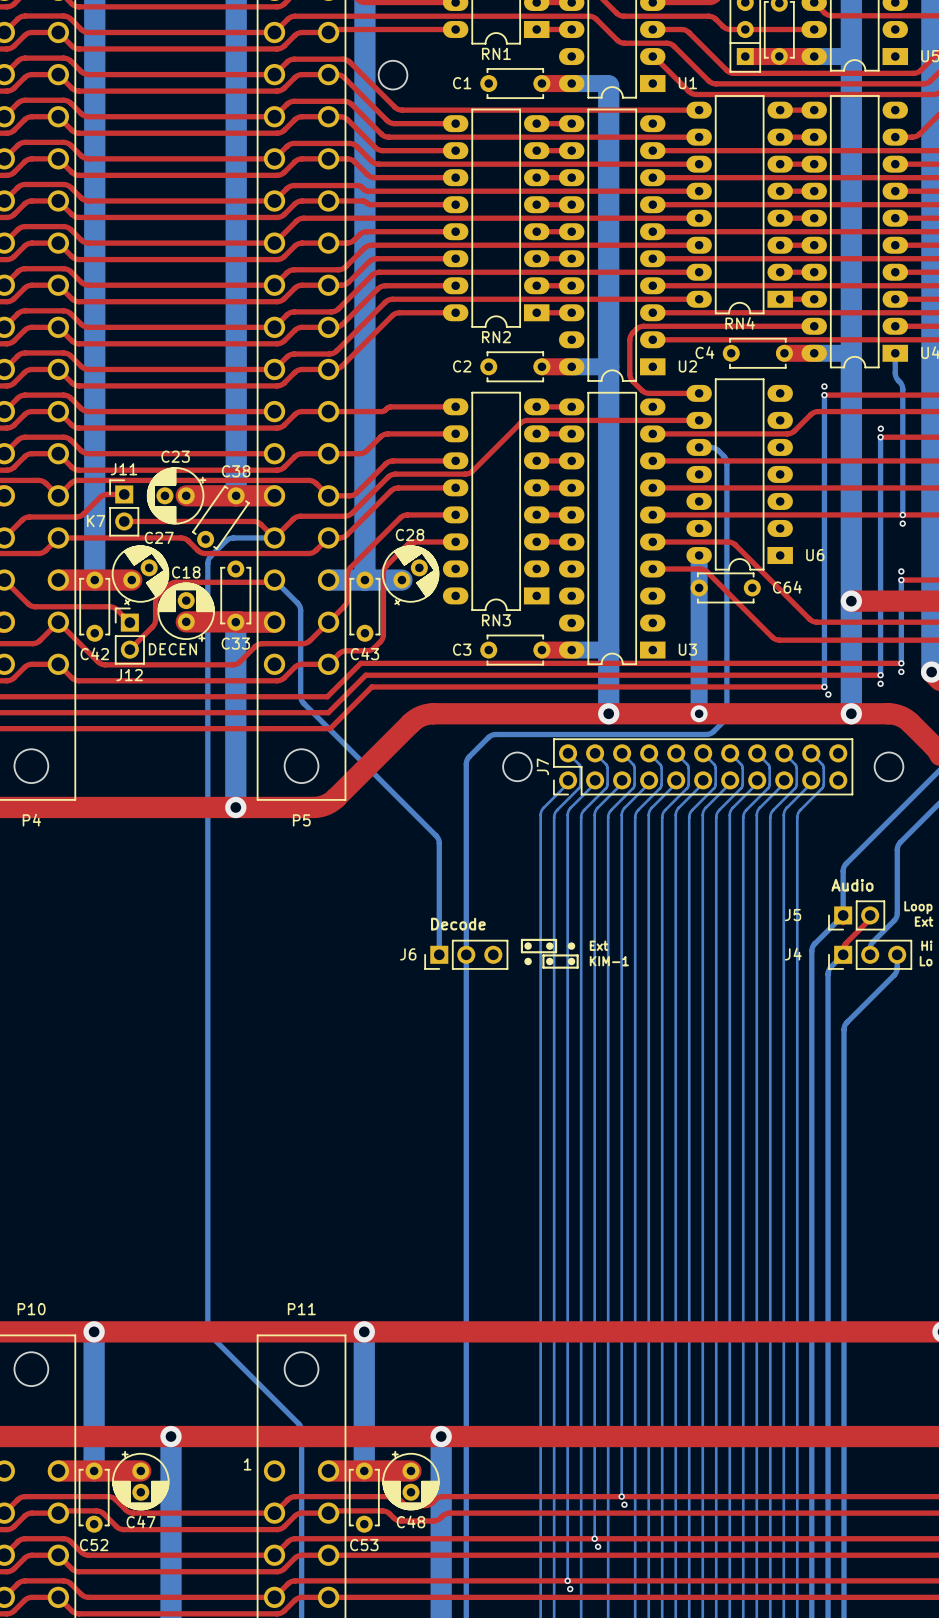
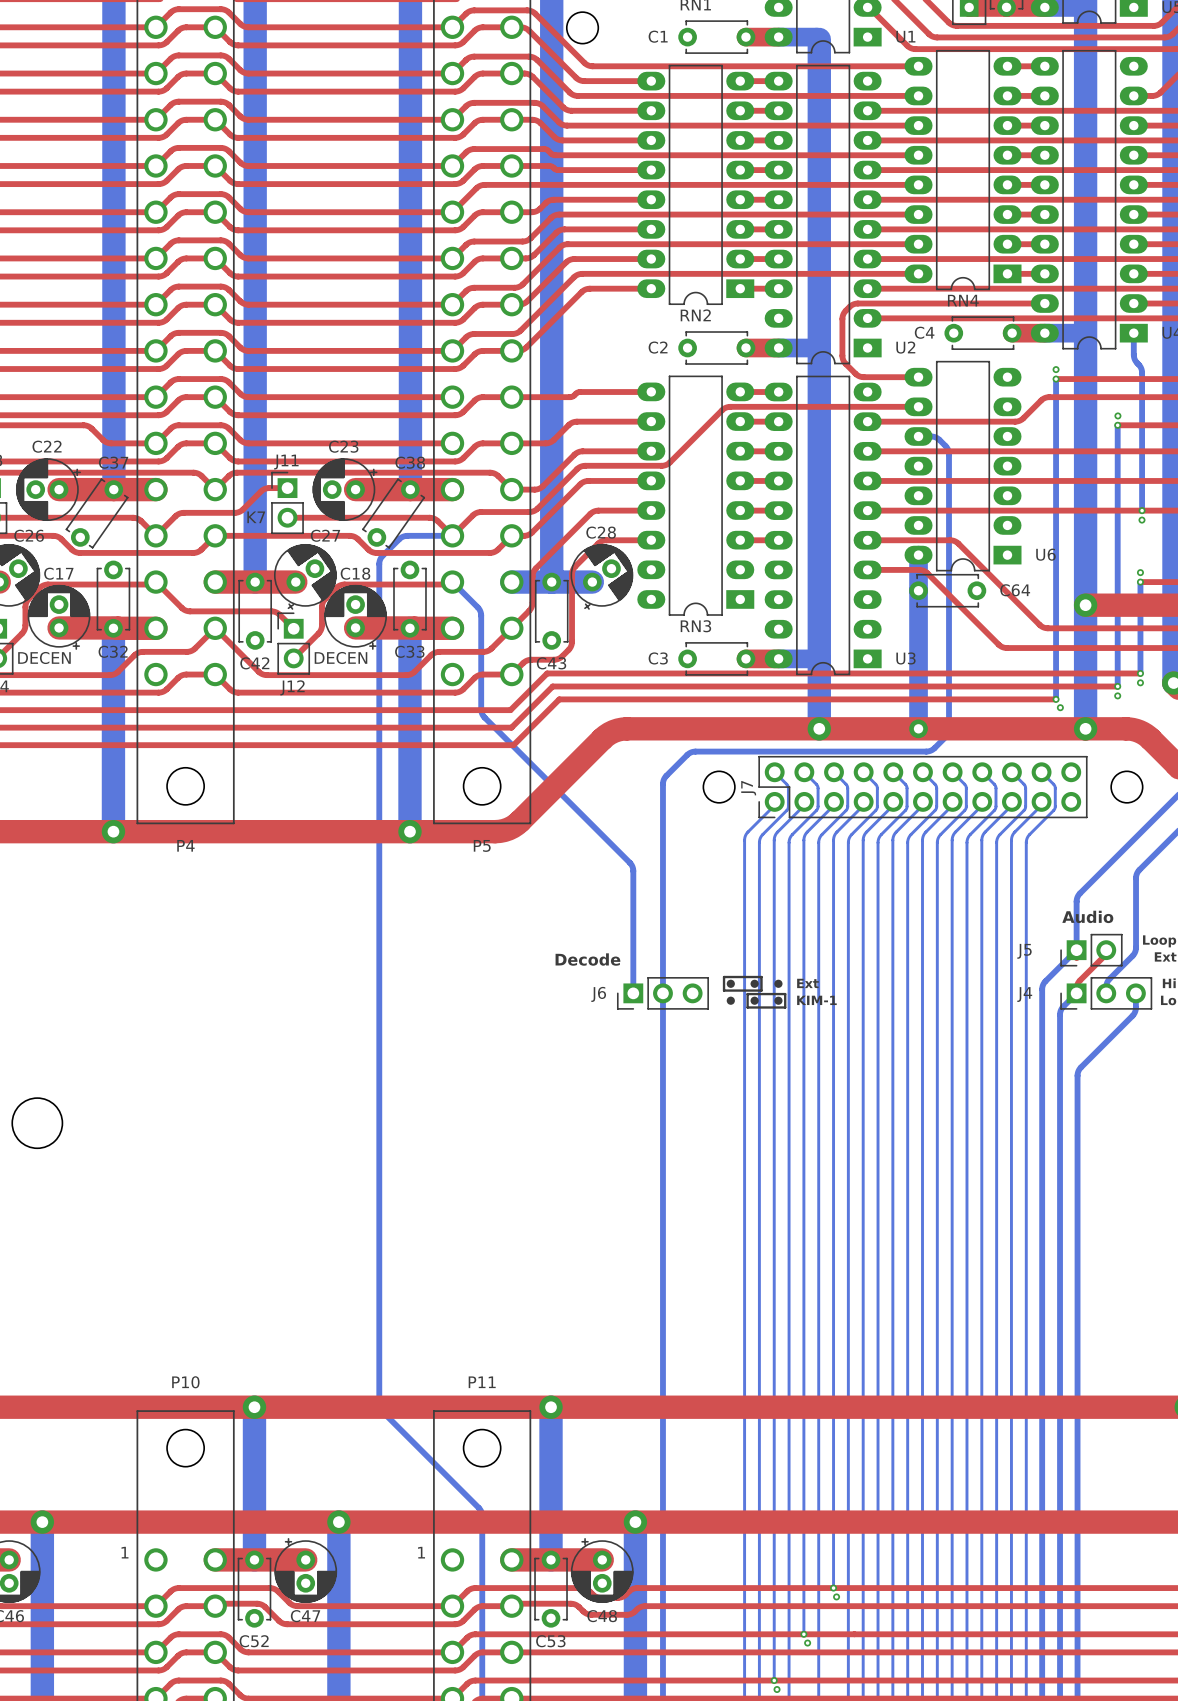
J6 value position: Decode (458, 924) -> Decode (587, 959)

